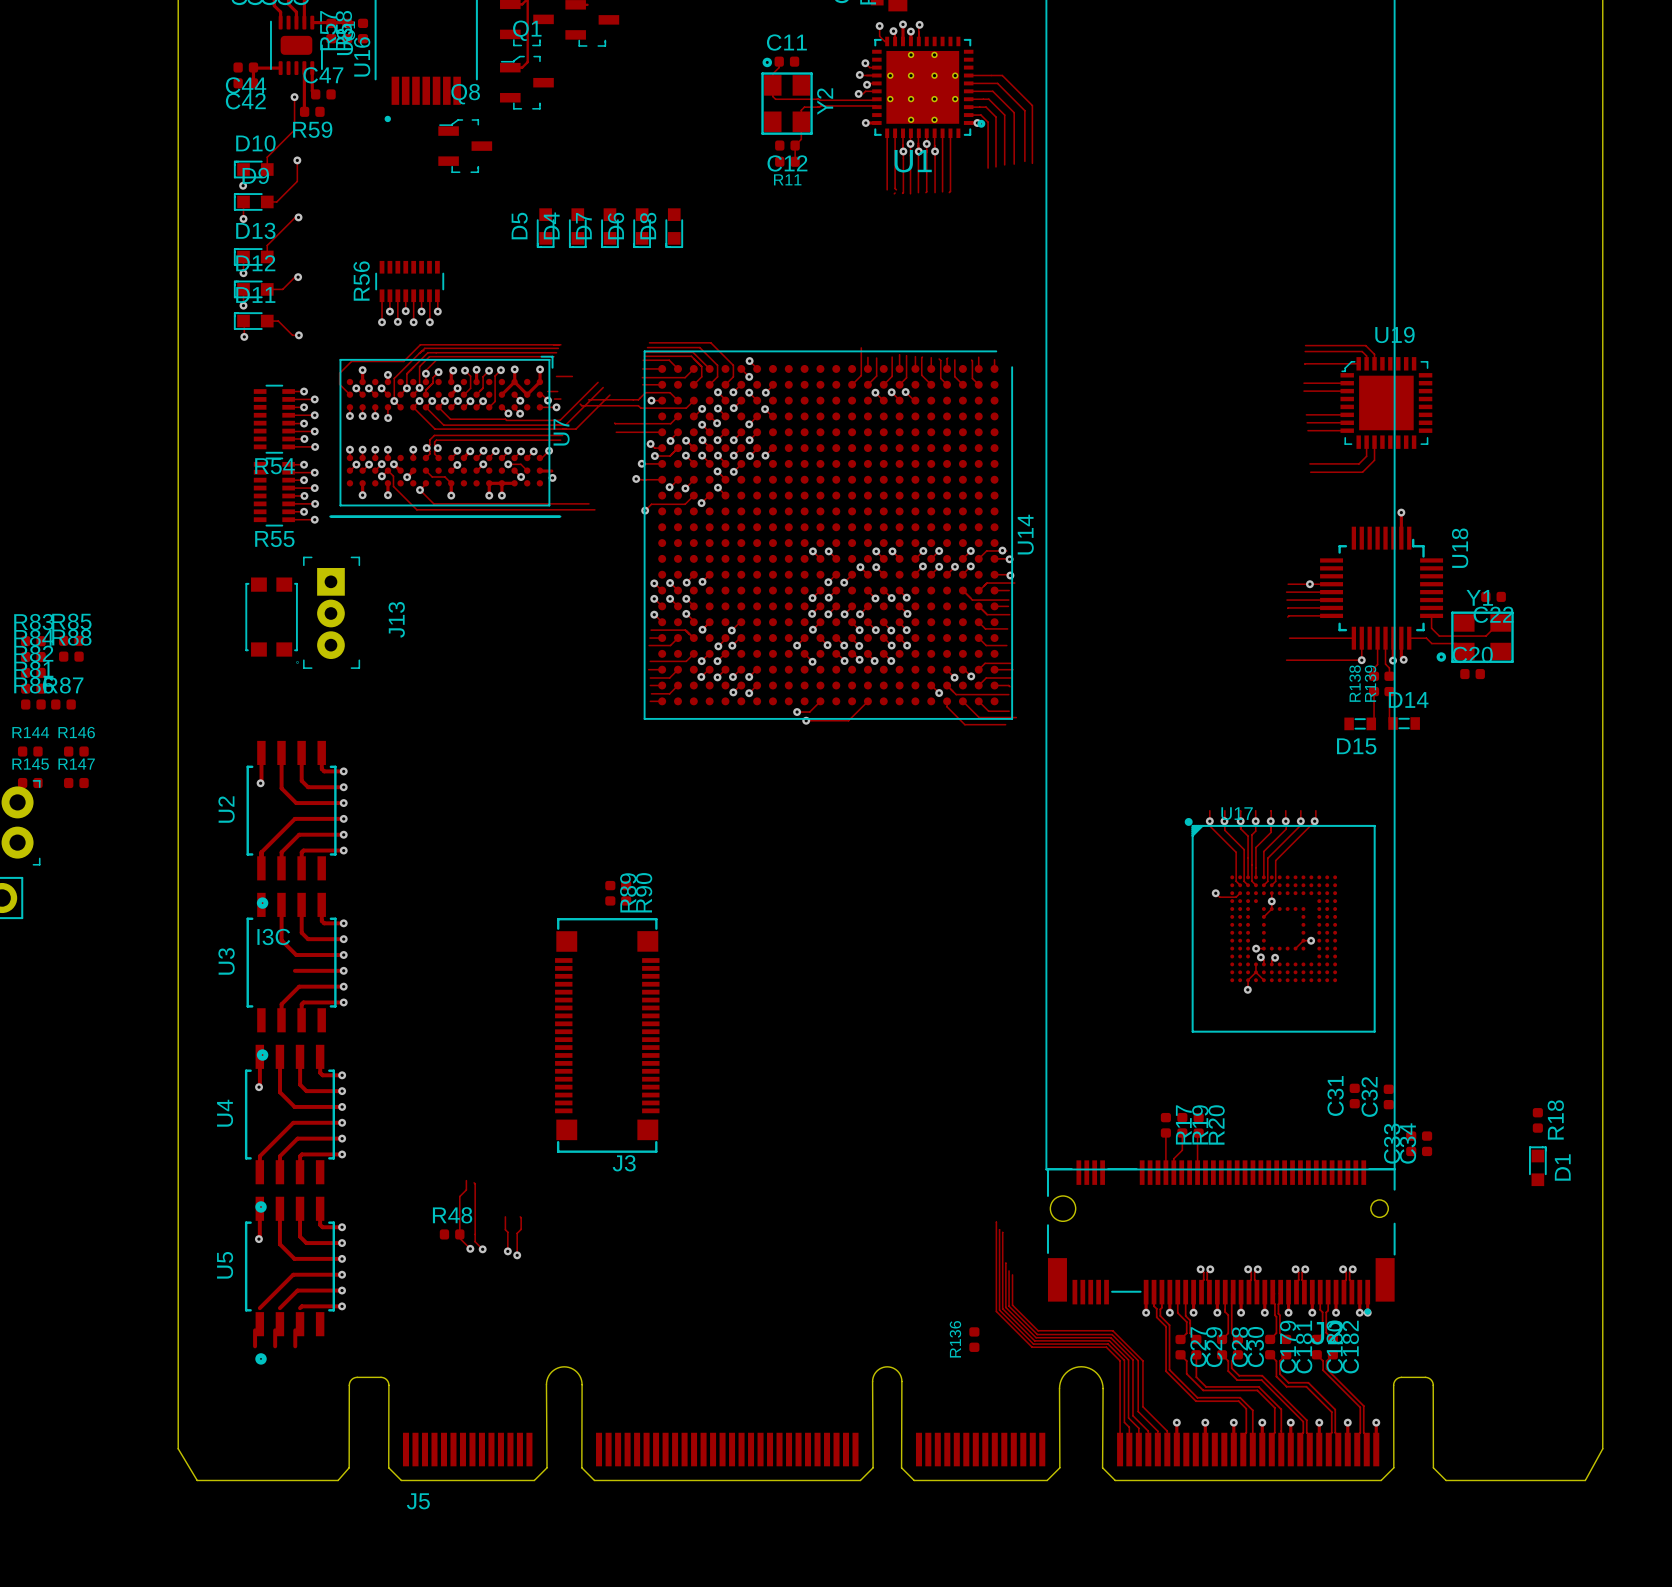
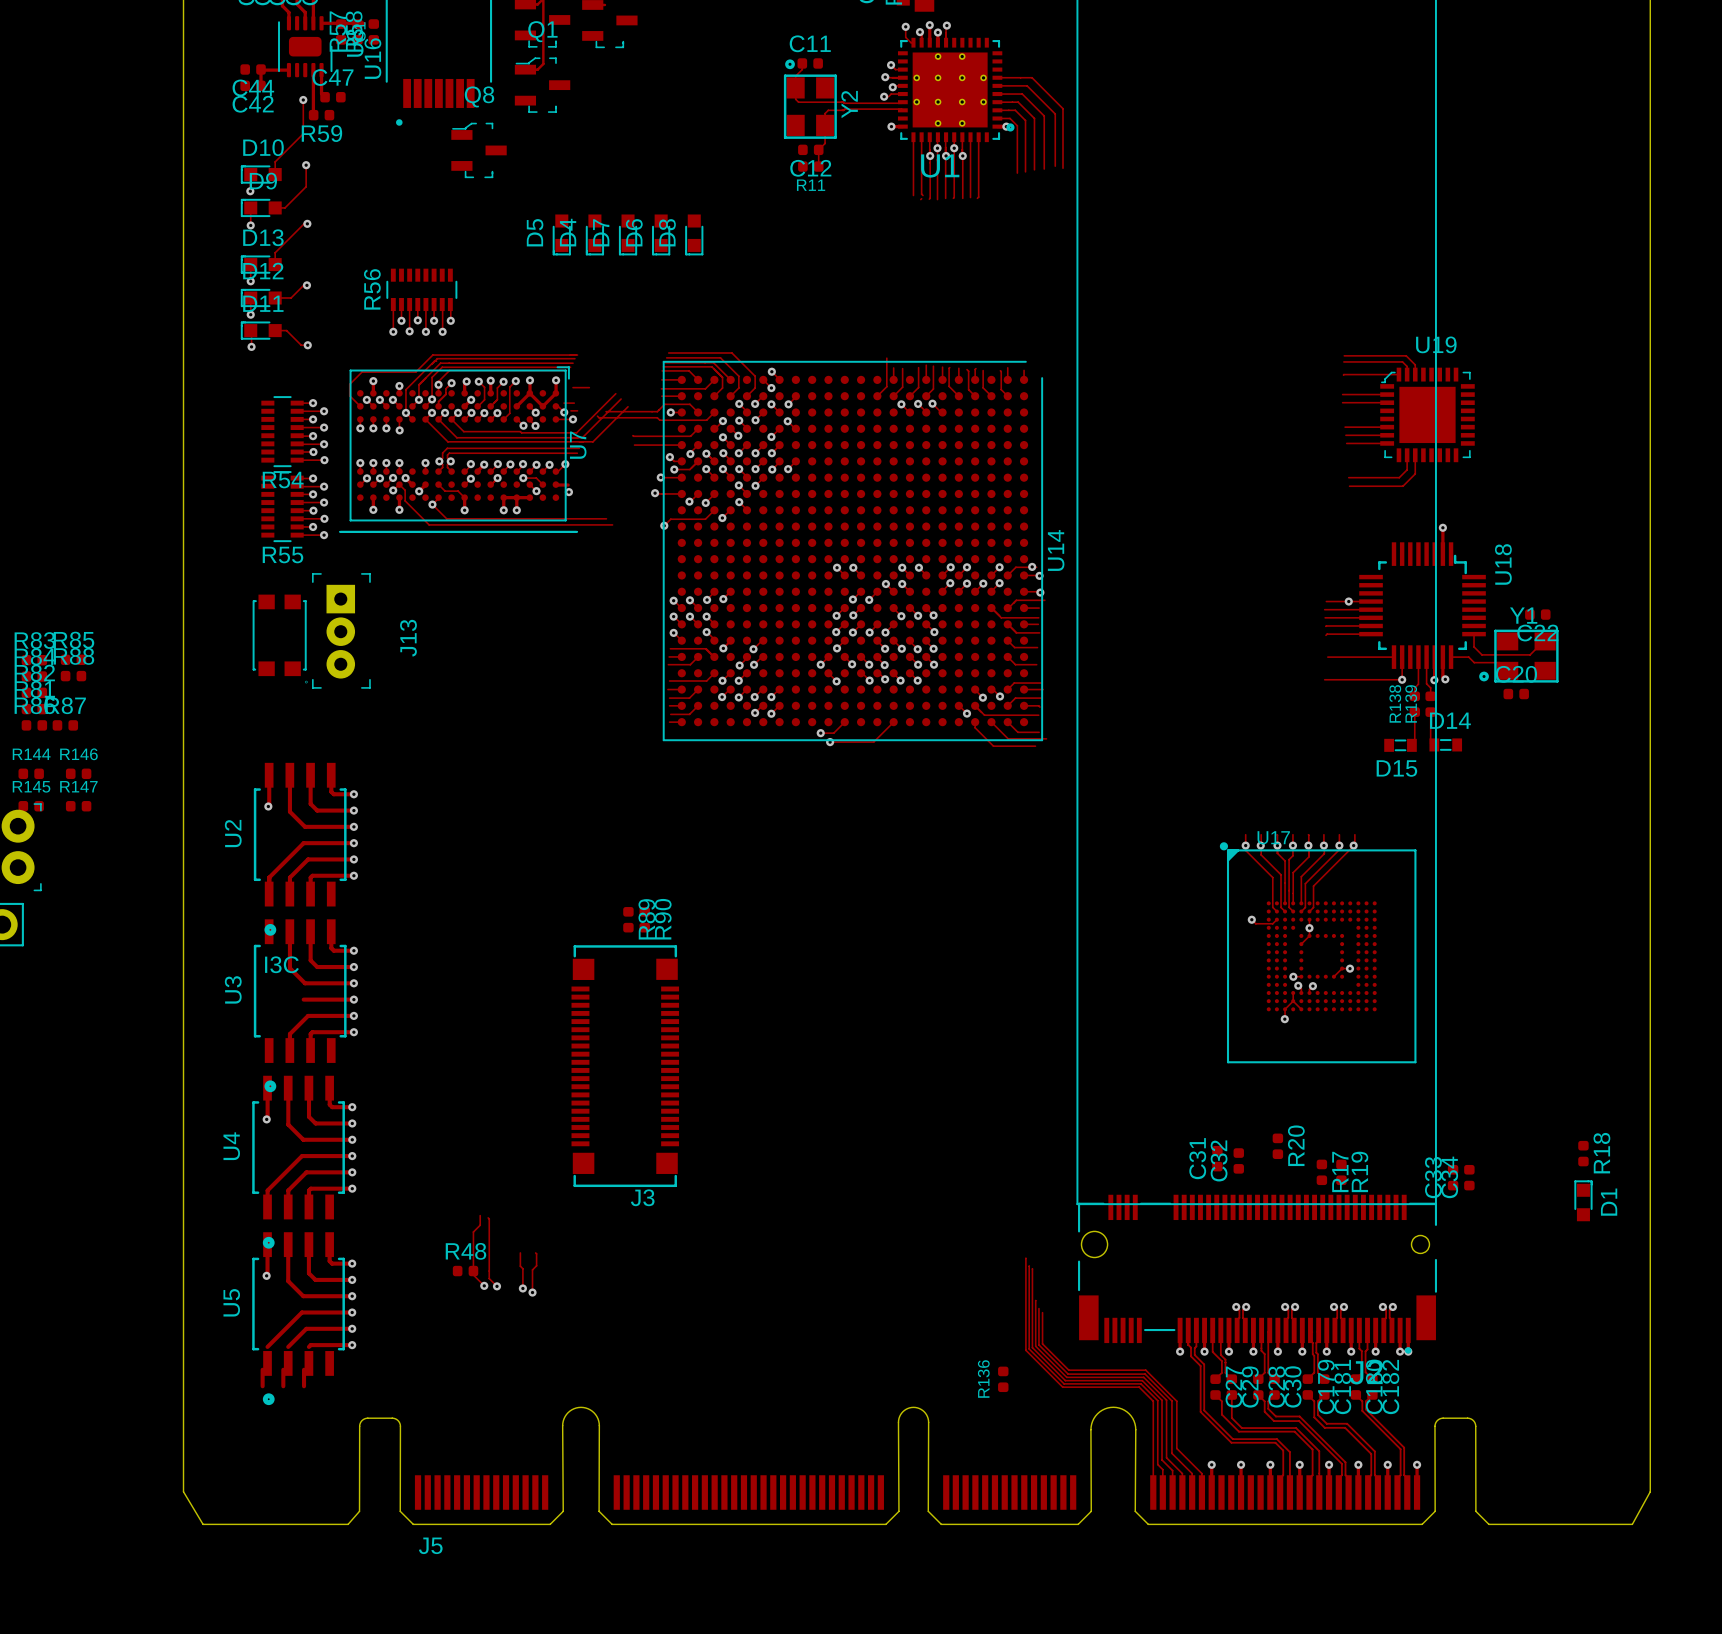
C31: (1354, 1096) -> none
C32 position: (1388, 1096) -> (1238, 1160)
R19 name: R19 (1200, 1124) -> C31 (1197, 1158)
R17 position: (1165, 1125) -> (1321, 1172)
R20 position: (1198, 1125) -> (1277, 1146)
track: (1165, 1132) (1165, 1172) -> none
track: (1182, 1132) (1182, 1150) (1173, 1158) (1173, 1172) -> none
track: (1198, 1133) (1197, 1172) -> none
R19: none -> (1341, 1172)

